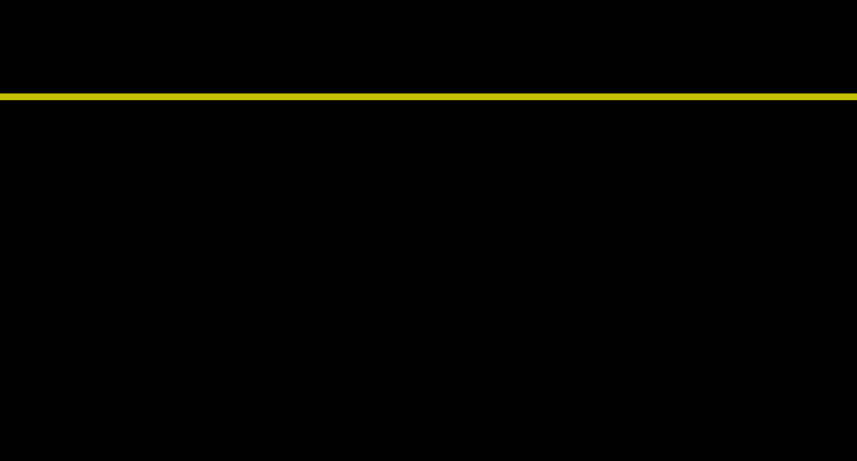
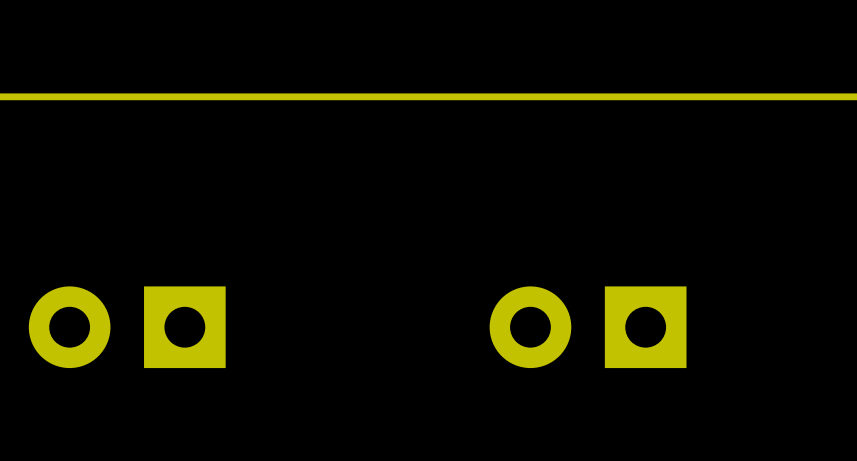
part: none -> (127, 327)
part: none -> (588, 327)

